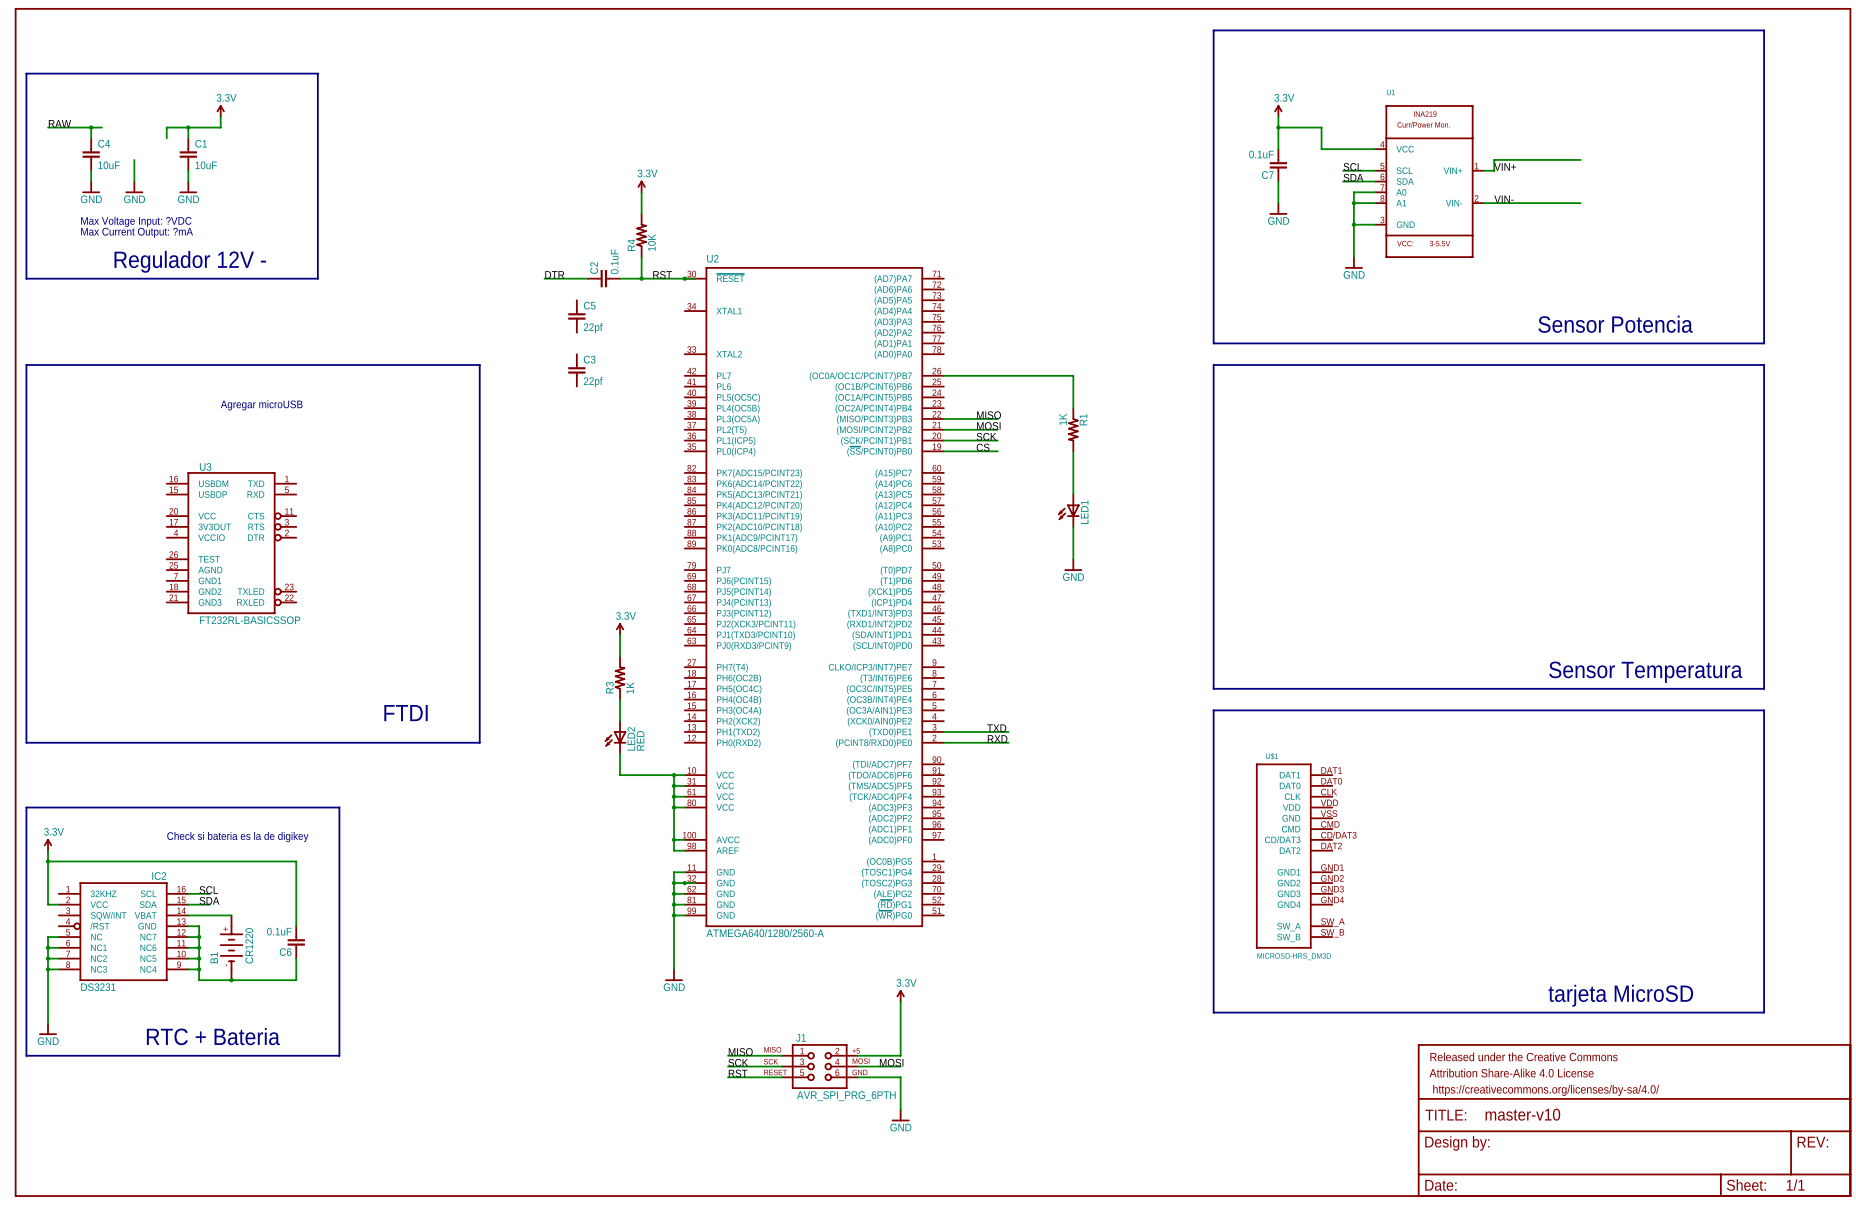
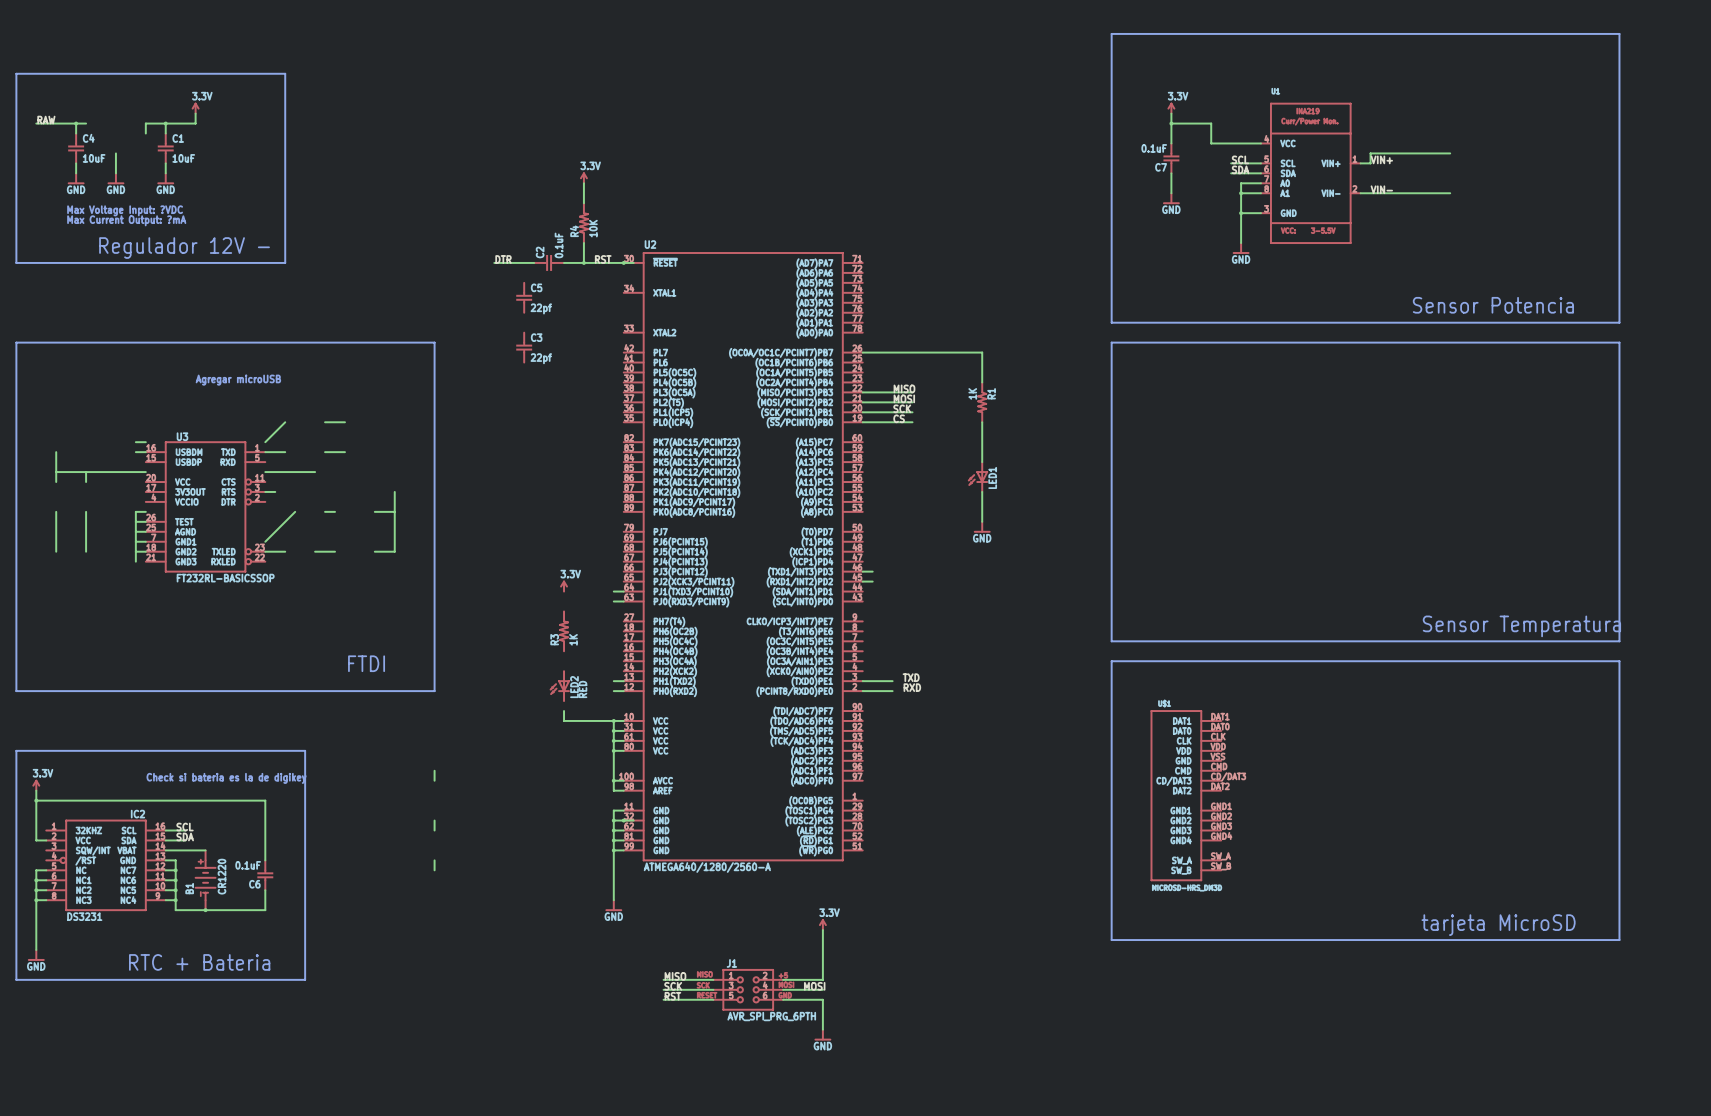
wire: none -> (285, 422) (265, 442)
wire: none -> (325, 422) (344, 422)
wire: none -> (135, 442) (145, 442)
wire: none -> (56, 452) (56, 482)
wire: none -> (135, 452) (145, 452)
wire: none -> (265, 452) (285, 452)
wire: none -> (325, 452) (344, 452)
wire: none -> (56, 472) (145, 472)
wire: none -> (86, 472) (86, 482)
wire: none -> (265, 472) (315, 472)
wire: none -> (265, 491) (275, 491)
wire: none -> (394, 491) (394, 551) (374, 551)
wire: none -> (56, 511) (56, 551)
wire: none -> (86, 511) (86, 551)
wire: none -> (145, 511) (135, 511) (135, 561)
wire: none -> (295, 511) (265, 541)
wire: none -> (325, 511) (335, 511)
wire: none -> (374, 511) (394, 511)
wire: none -> (135, 521) (145, 521)
wire: none -> (135, 531) (145, 531)
wire: none -> (135, 541) (145, 541)
wire: none -> (135, 551) (145, 551)
wire: none -> (265, 551) (285, 551)
wire: none -> (315, 551) (335, 551)
part: (933, 602) -> none
wire: none -> (862, 571) (872, 571)
wire: none -> (862, 581) (872, 581)
wire: (620, 634) (620, 656) -> none
wire: none -> (613, 591) (623, 591)
wire: none -> (613, 601) (623, 601)
wire: (620, 699) (620, 721) -> none
wire: none -> (613, 681) (623, 681)
wire: (976, 731) (1008, 731) -> none
wire: none -> (613, 691) (623, 691)
wire: (976, 742) (1008, 742) -> none
wire: (620, 753) (620, 764) -> none
wire: none -> (434, 770) (434, 780)
wire: none -> (434, 820) (434, 830)
wire: none -> (434, 860) (434, 870)
part: (1634, 1120) -> none

